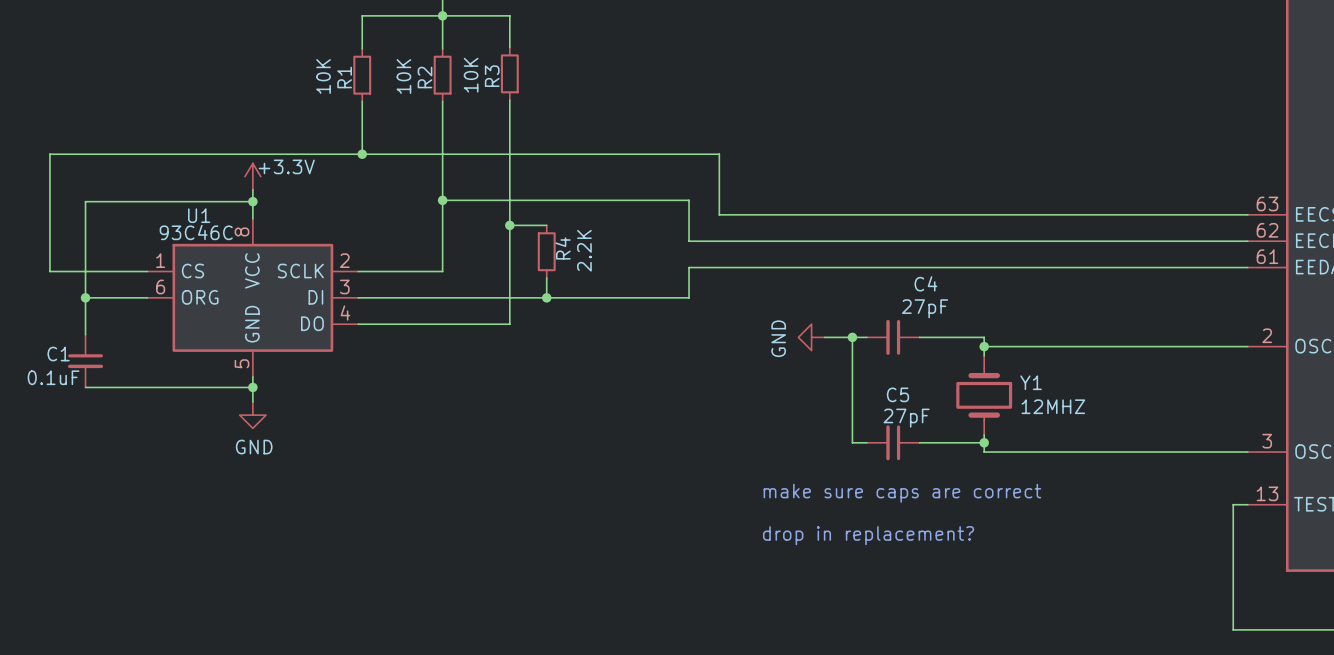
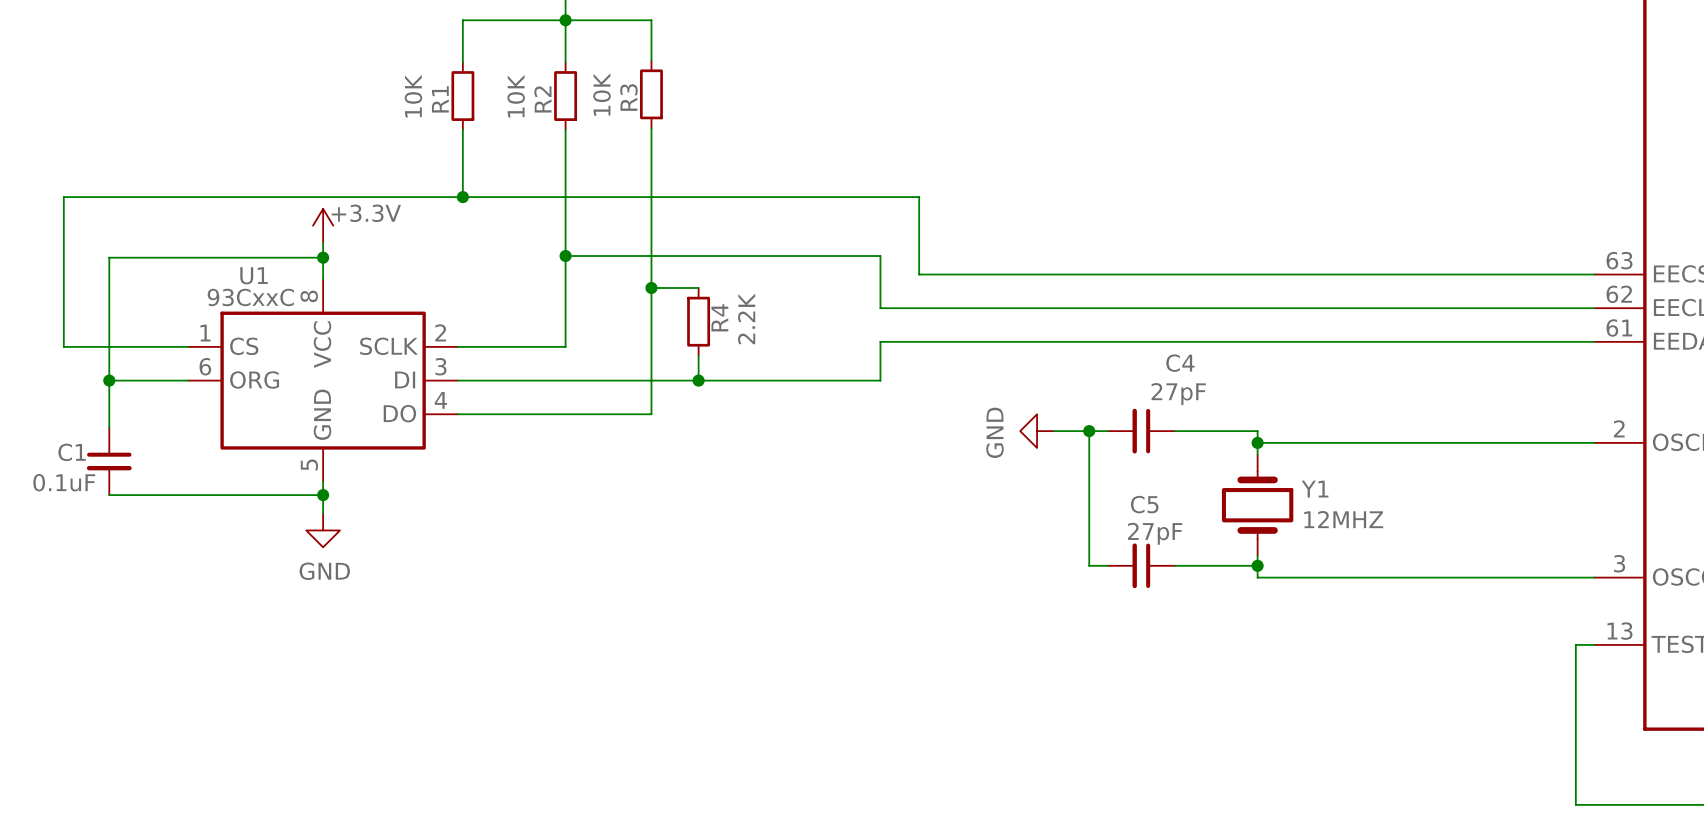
U1 value: 93C46C (196, 232) -> 93CxxC (250, 297)
text: make sure caps are correct (902, 493) -> none
text: drop in replacement? (868, 535) -> none

